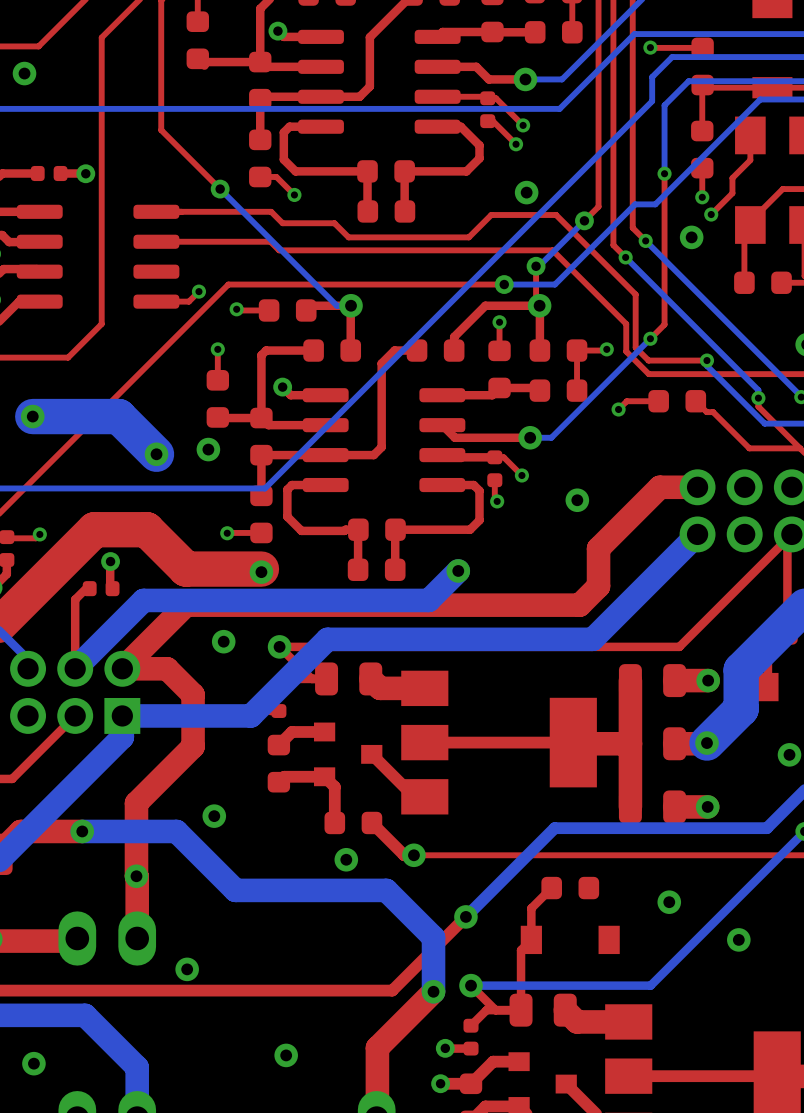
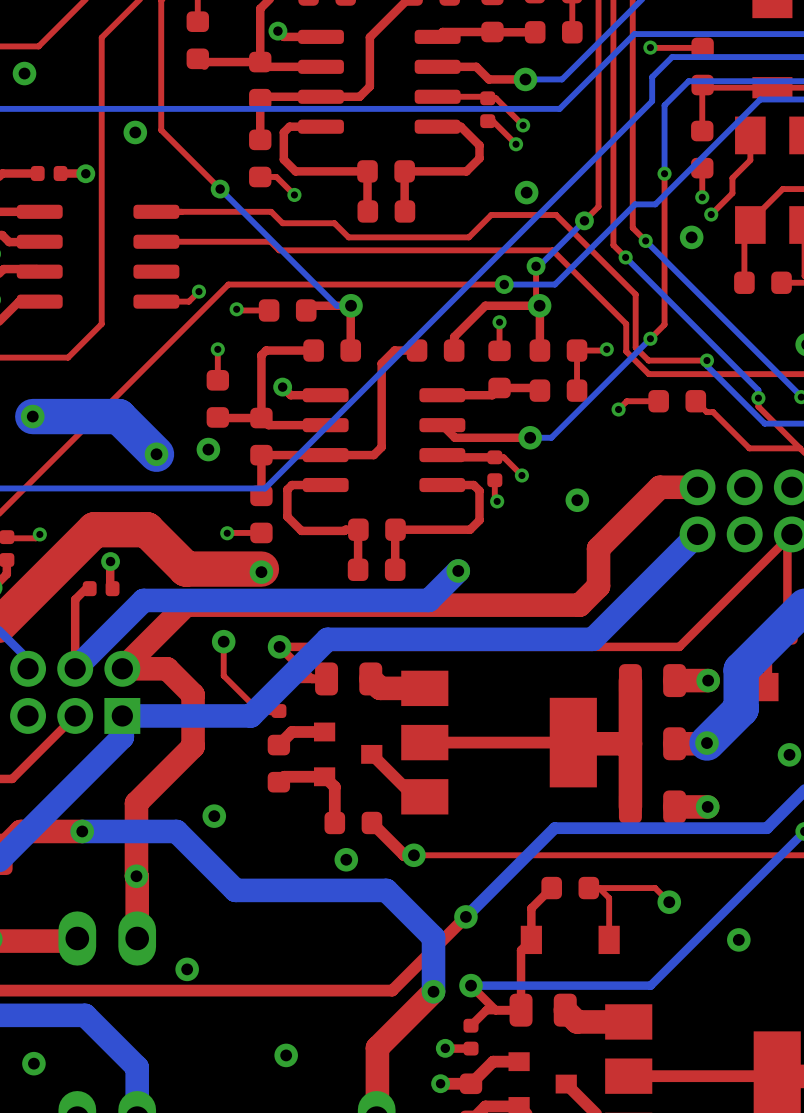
via: none -> (135, 132)
top track: none -> (223, 641) (223, 675) (258, 711) (270, 711)
top track: none -> (588, 888) (655, 888) (669, 902)
top track: none -> (599, 888) (609, 898) (609, 939)

